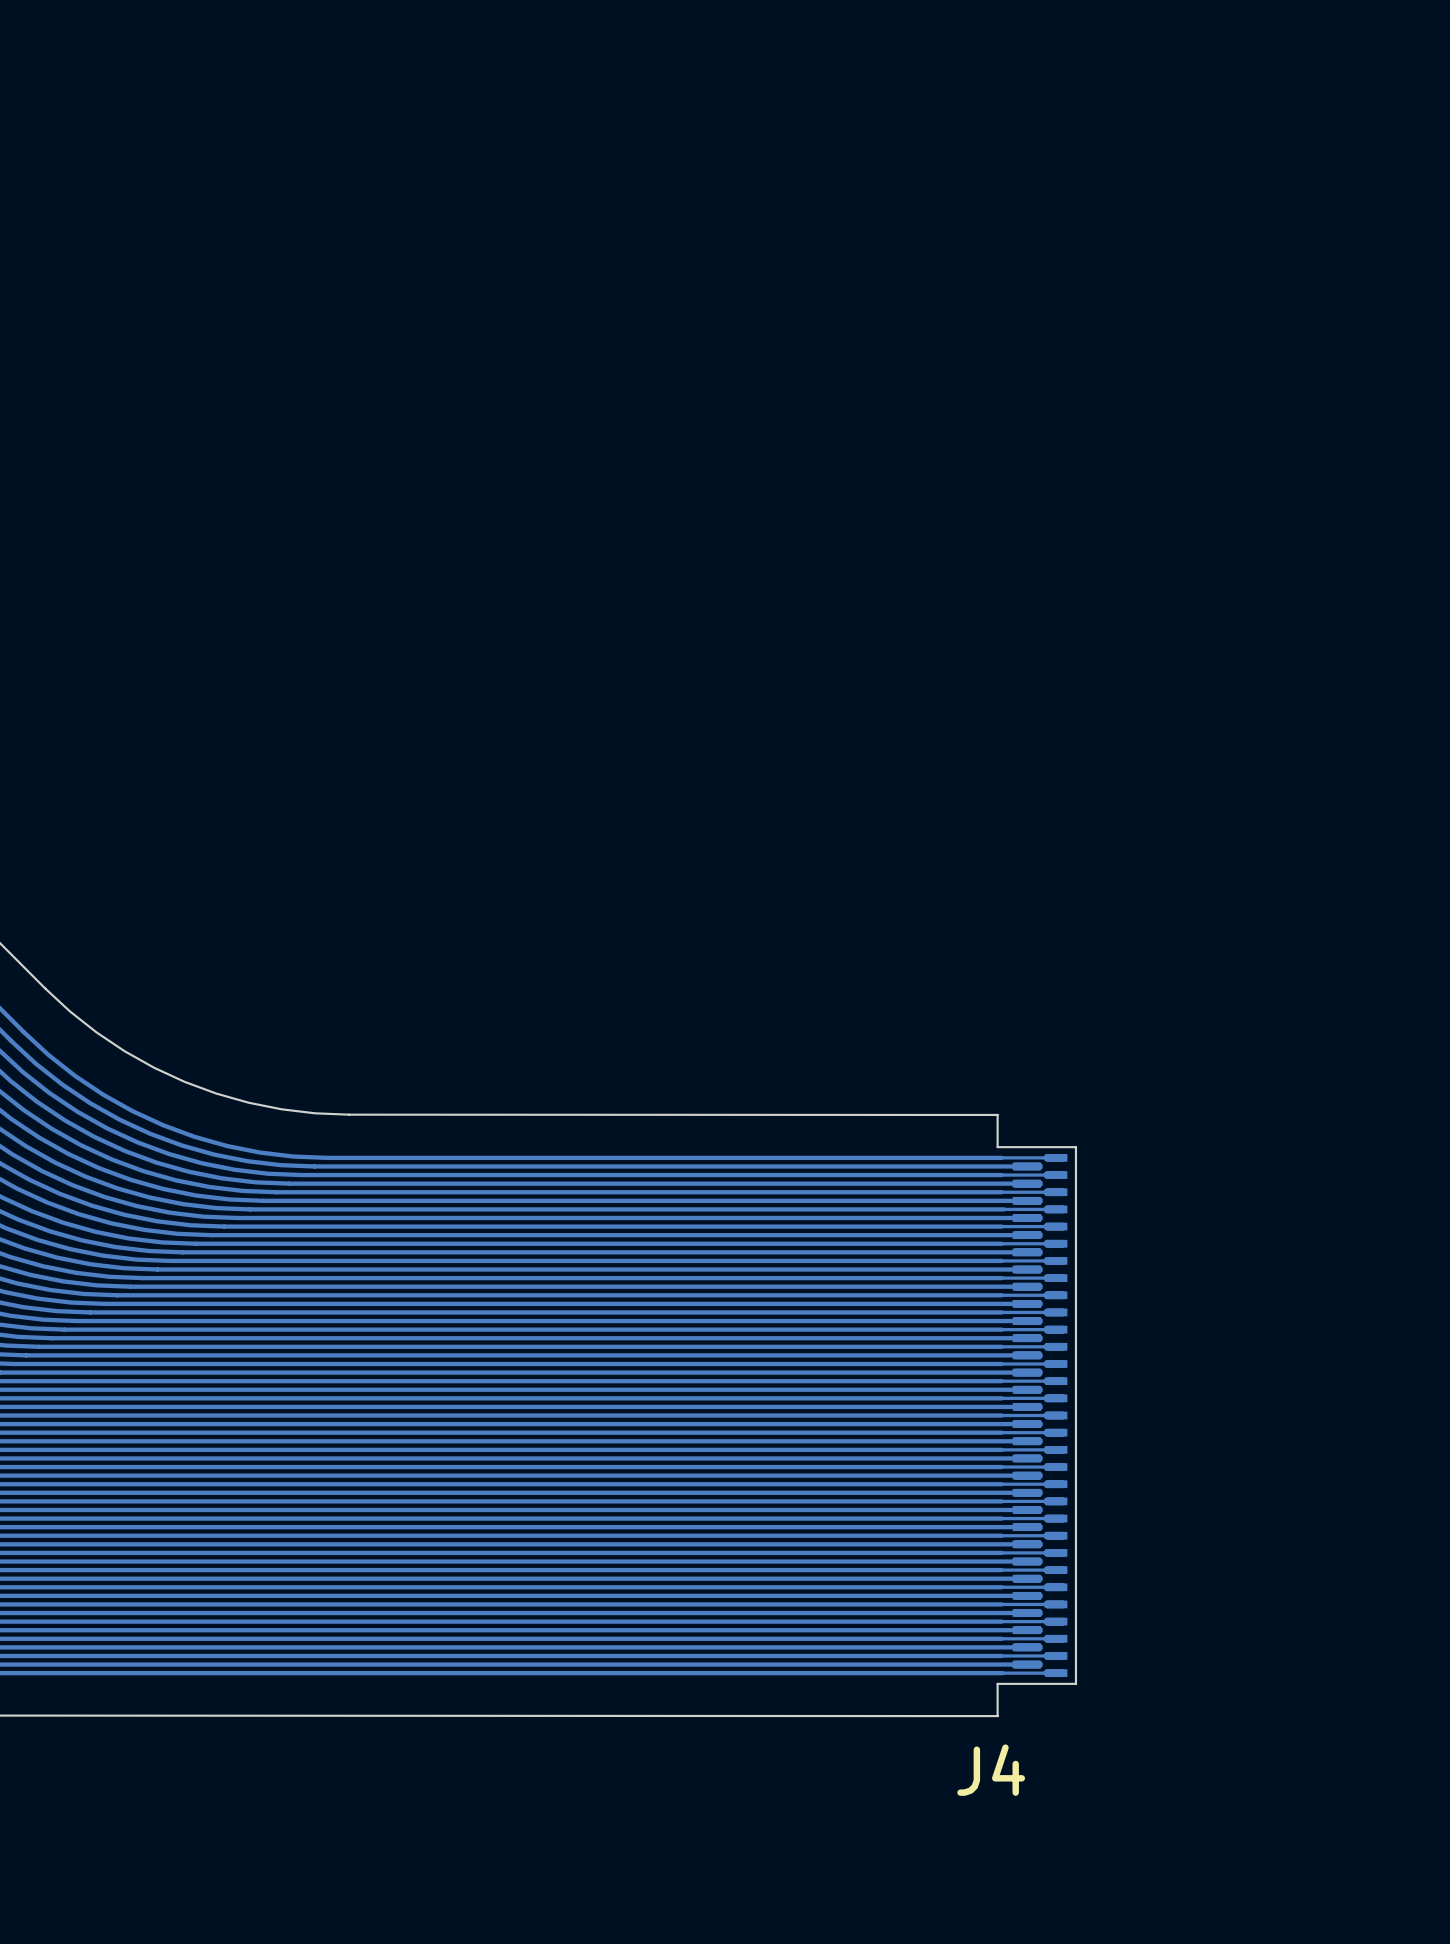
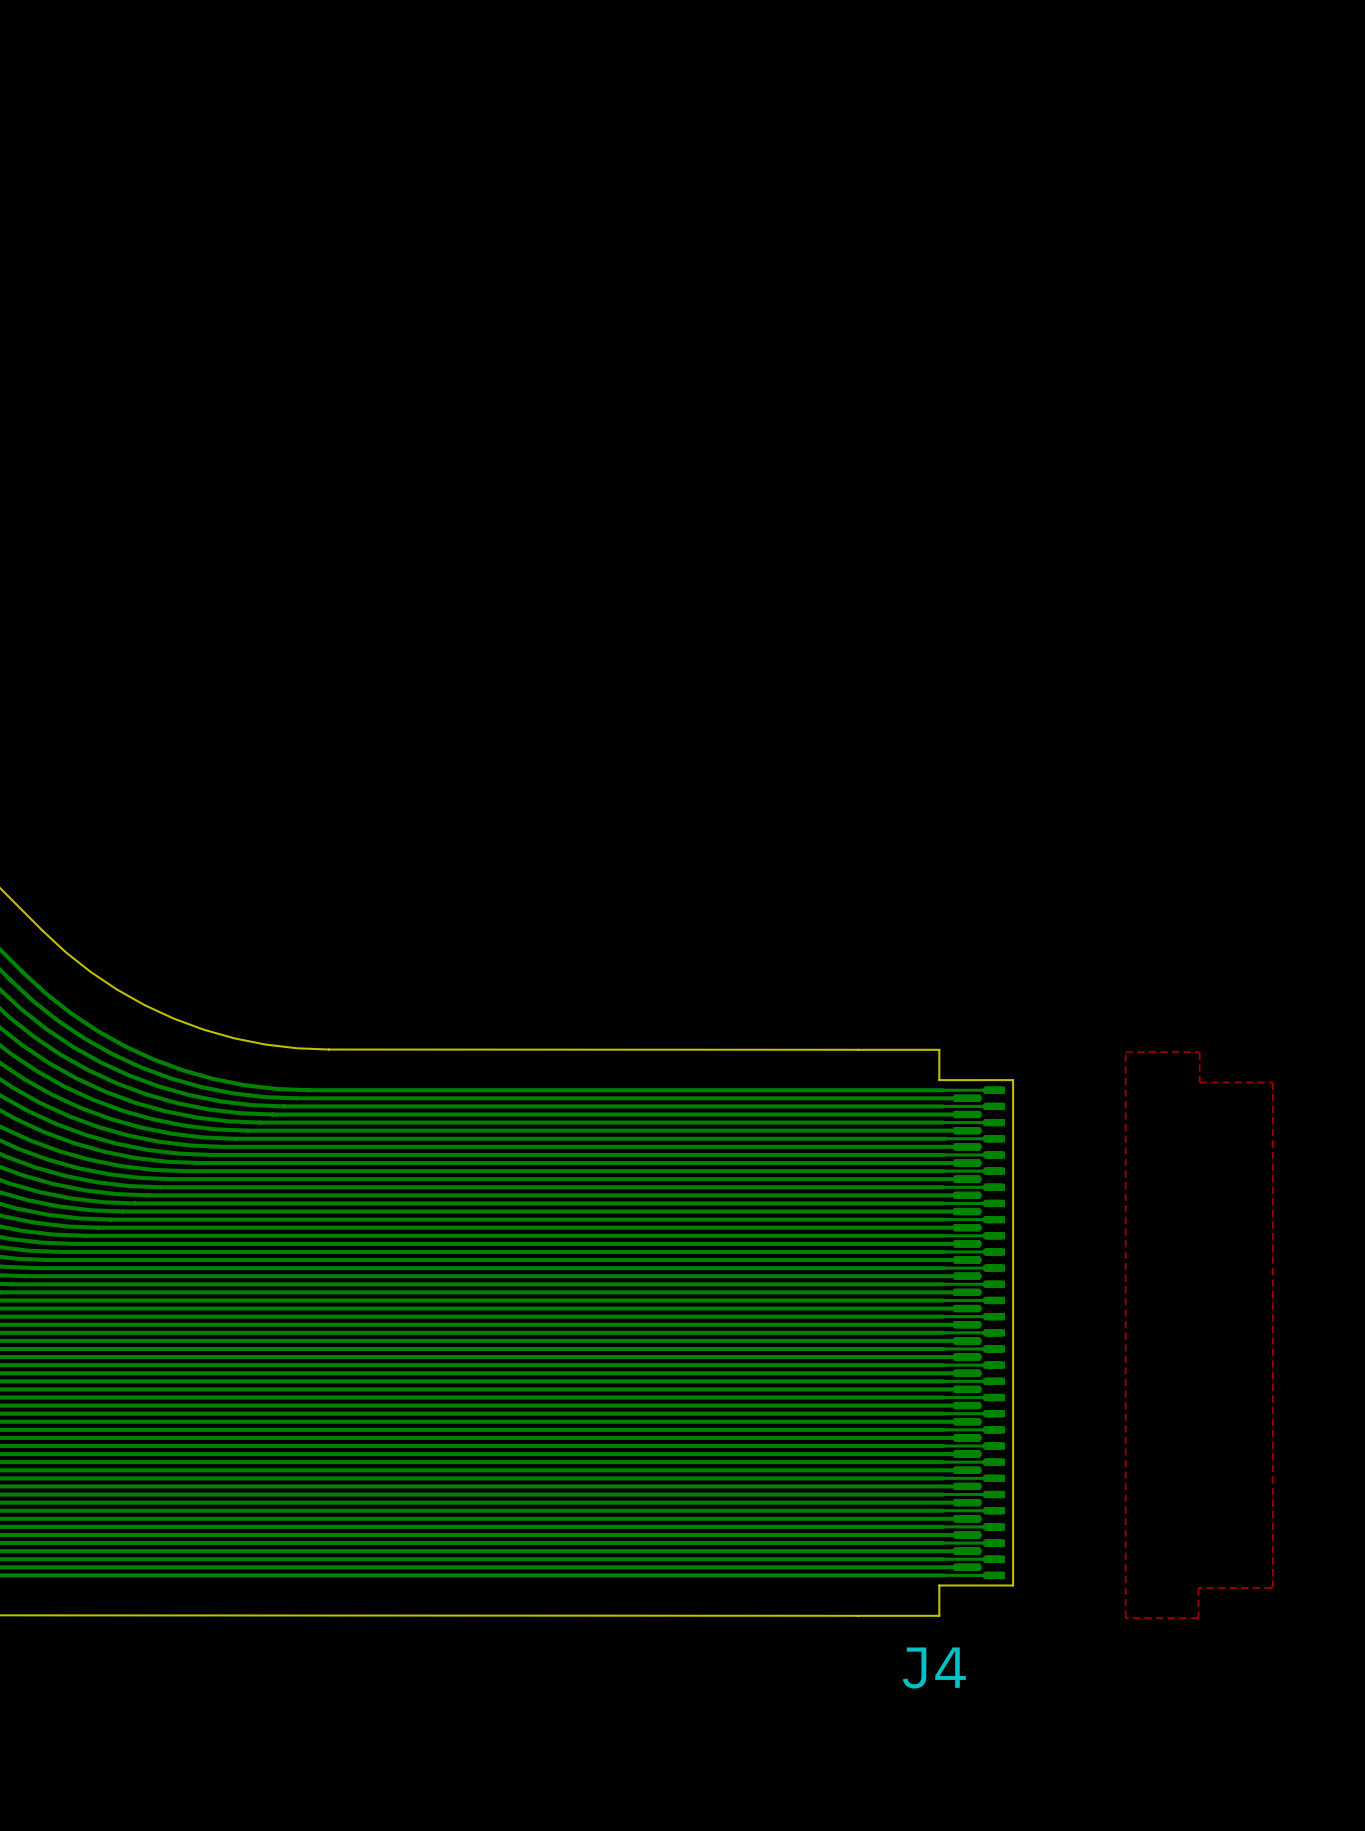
top zone outline: none -> (1199, 1052) (1125, 1052) (1125, 1617)
top zone outline: none -> (1199, 1052) (1199, 1082) (1272, 1082) (1272, 1586) (1198, 1587)
top zone outline: none -> (1198, 1588) (1198, 1617)
top zone outline: none -> (1198, 1618) (1126, 1618)

